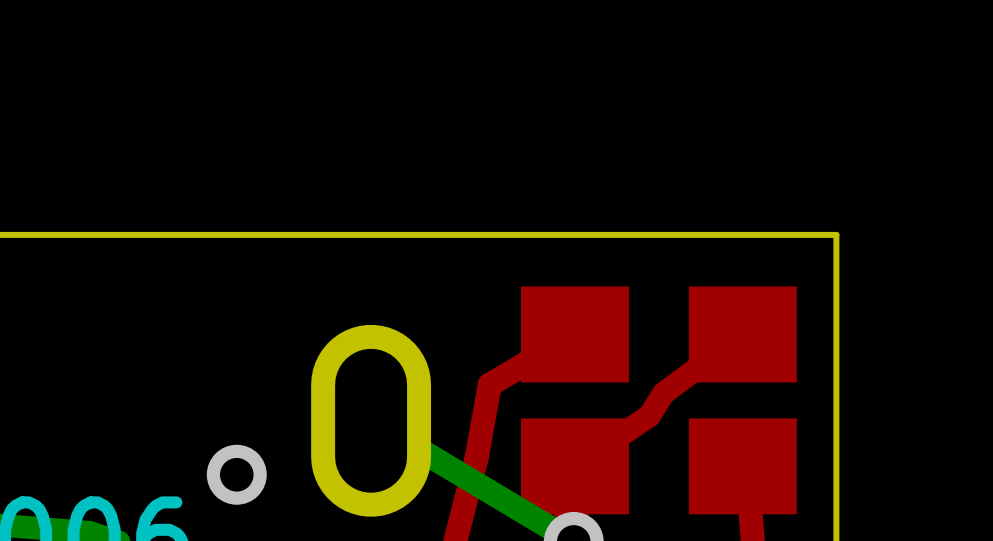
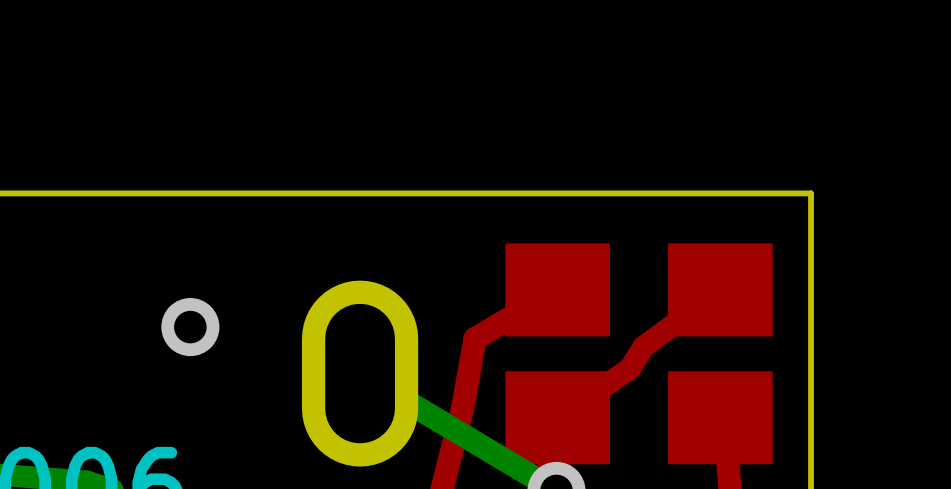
via position: (236, 474) -> (190, 327)

